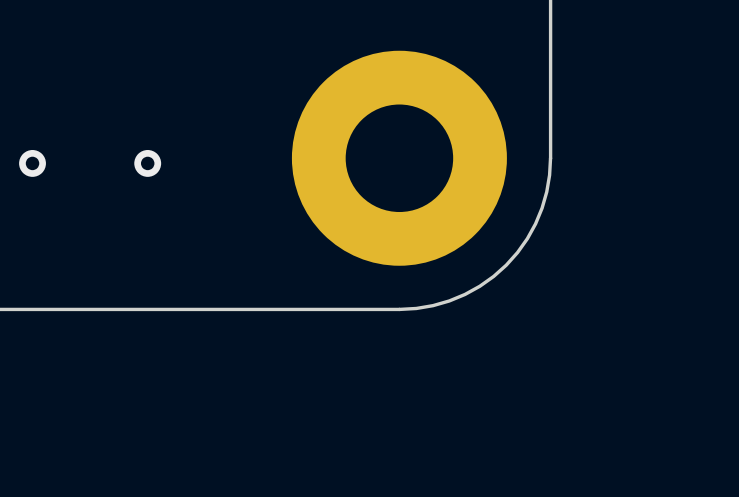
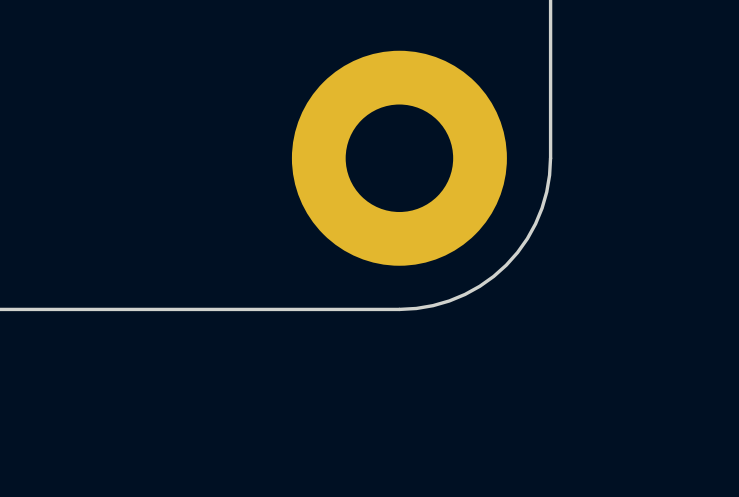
via: (32, 163) -> none
via: (147, 163) -> none

